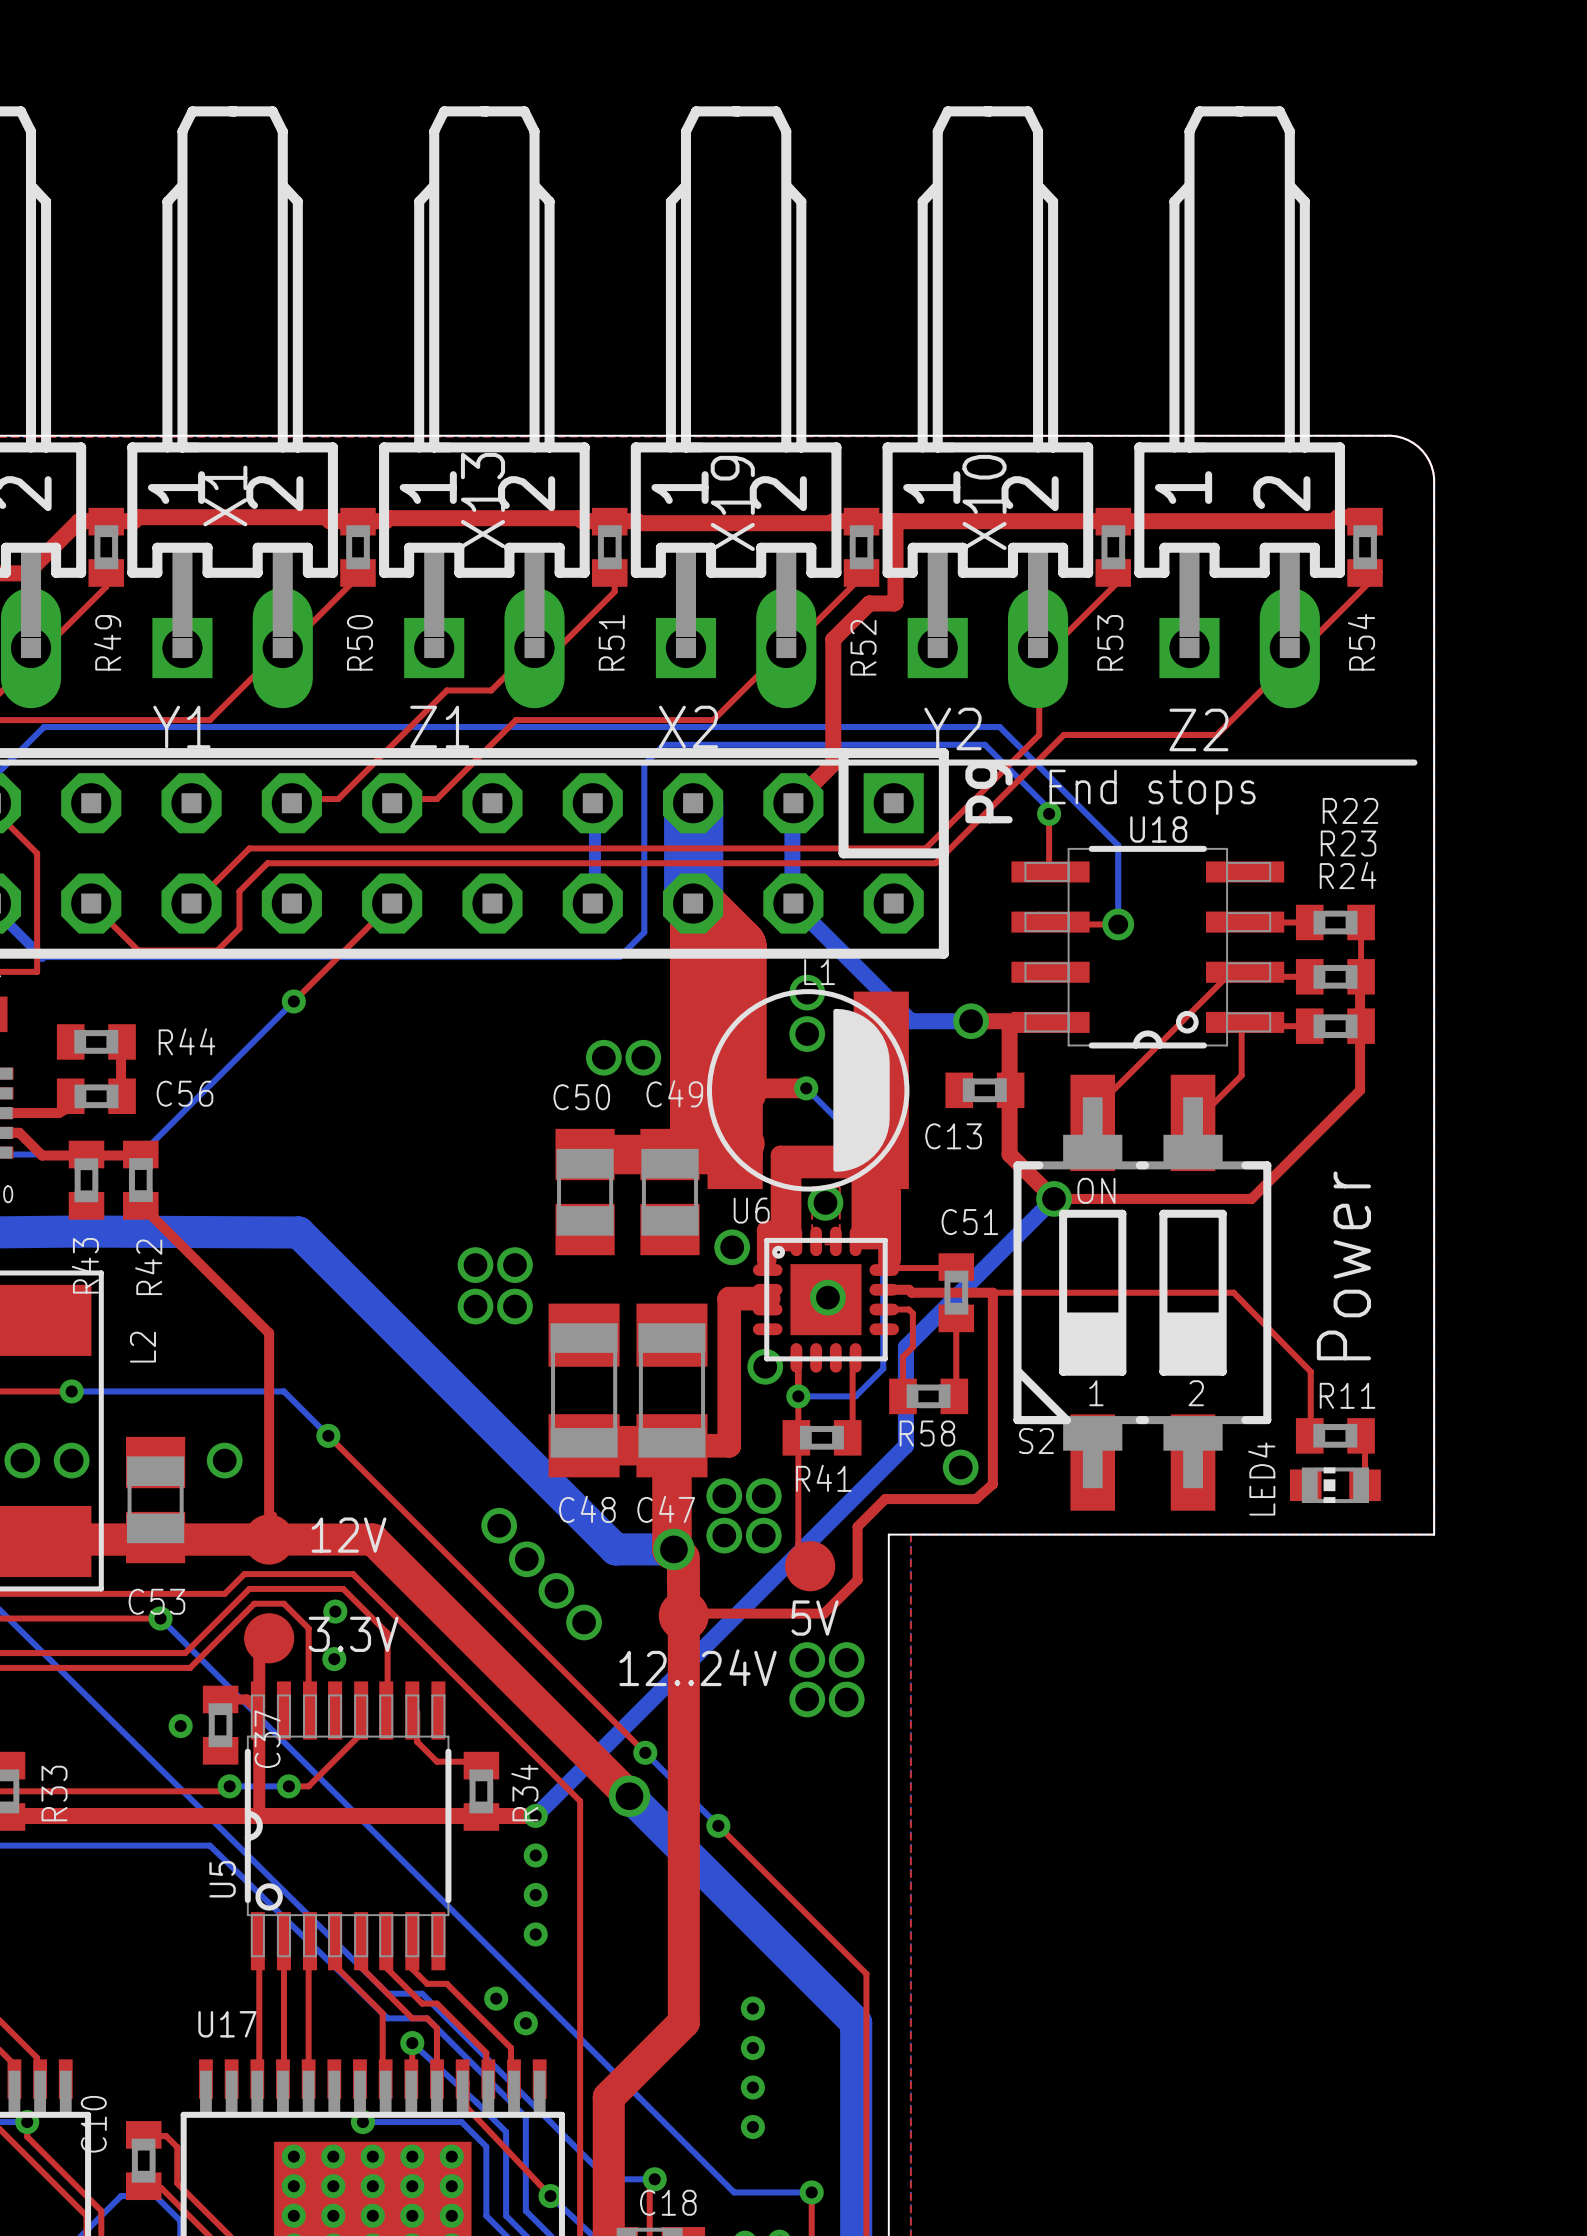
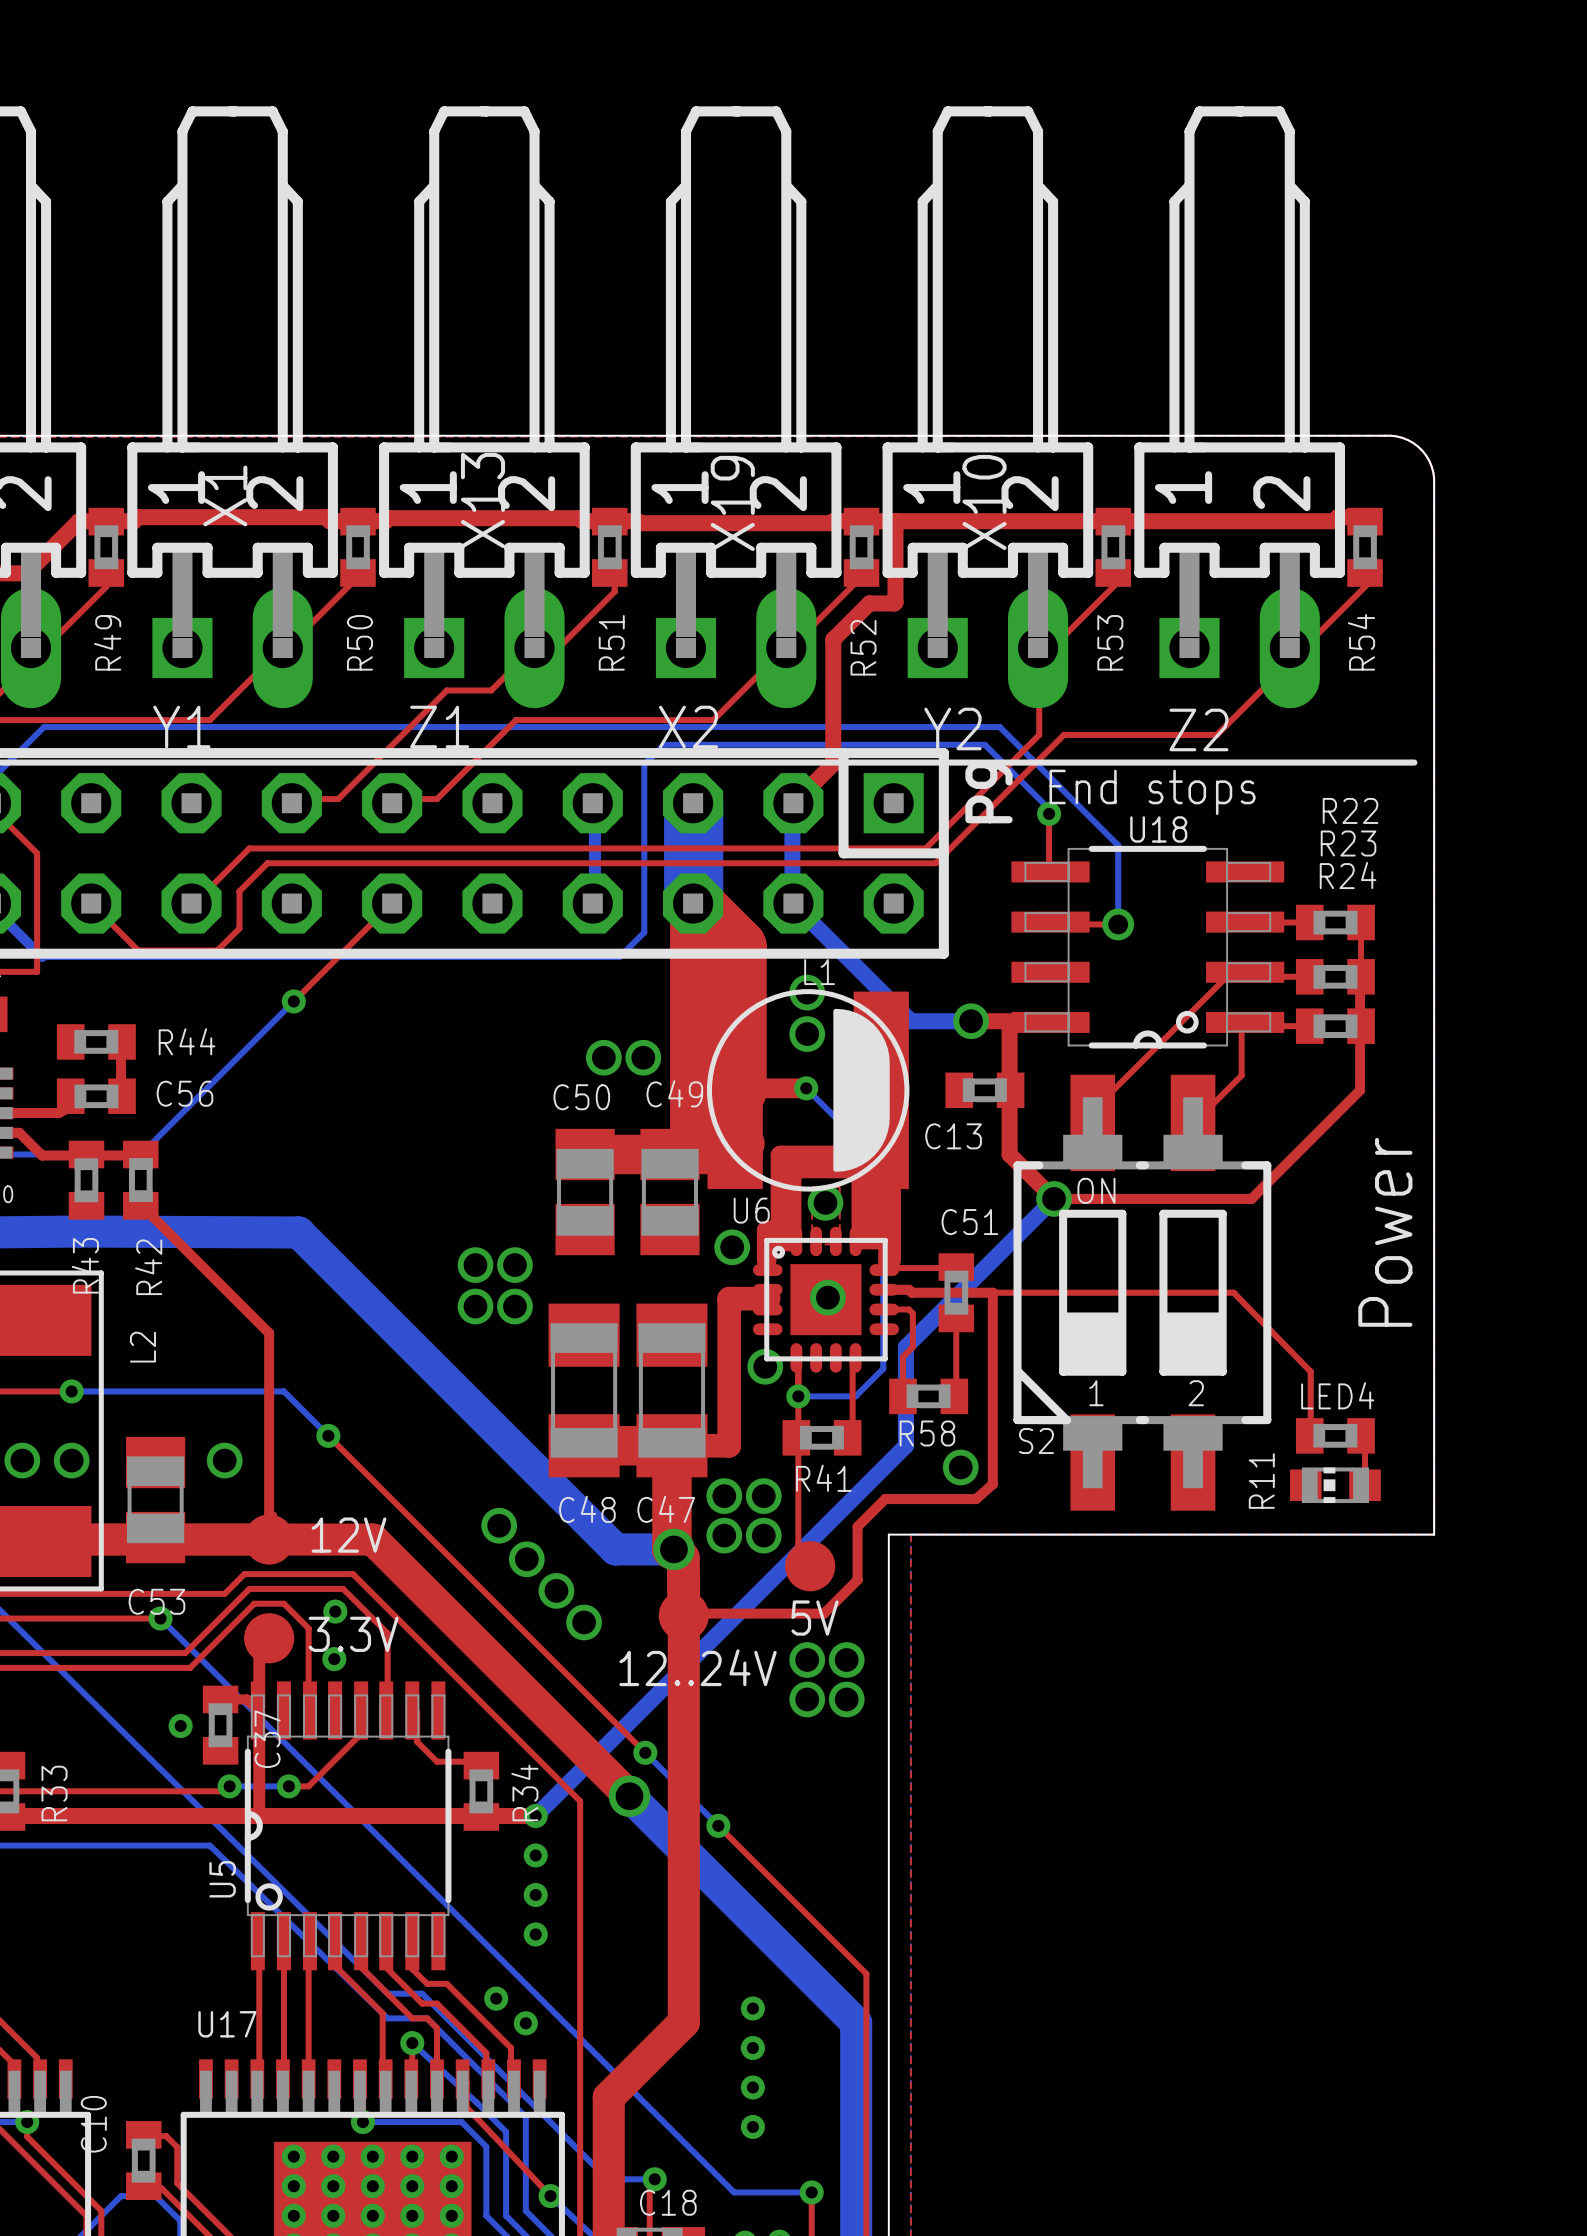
text position: Power (1343, 1265) -> Power (1385, 1232)
R11 name rotation: 0° (1347, 1395) -> 90° counterclockwise (1261, 1481)
R11 name position: R11 (1347, 1395) -> R11 (1261, 1481)
LED4 name rotation: 0° (1261, 1479) -> 90° clockwise (1337, 1395)
LED4 name position: LED4 (1261, 1479) -> LED4 (1337, 1395)

